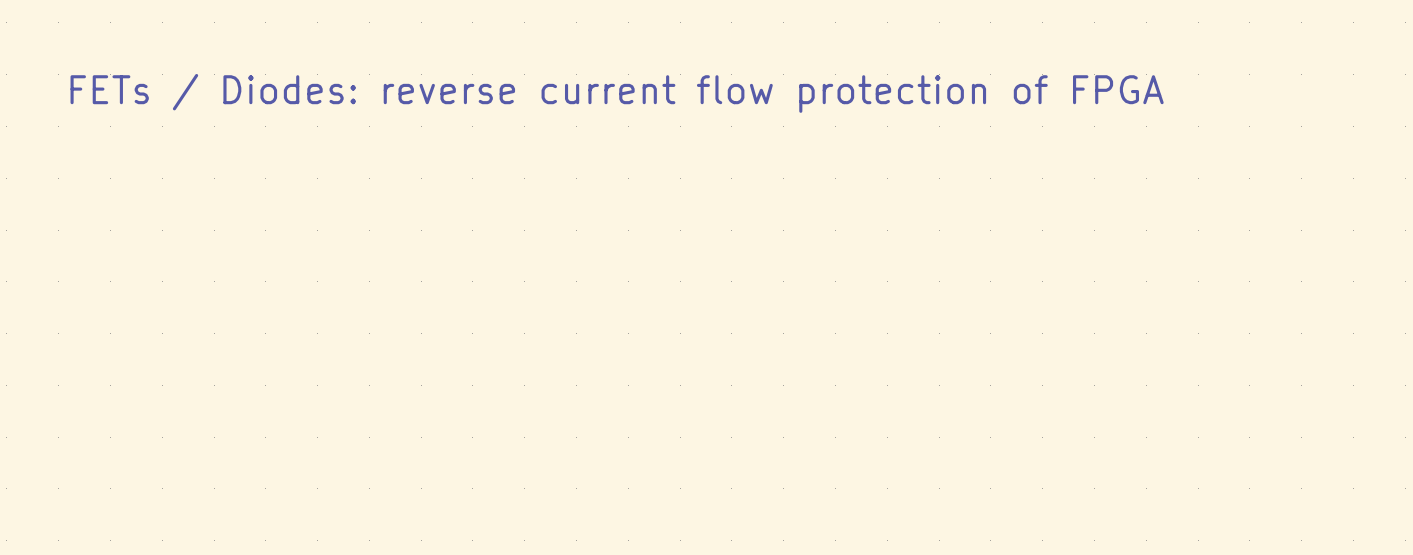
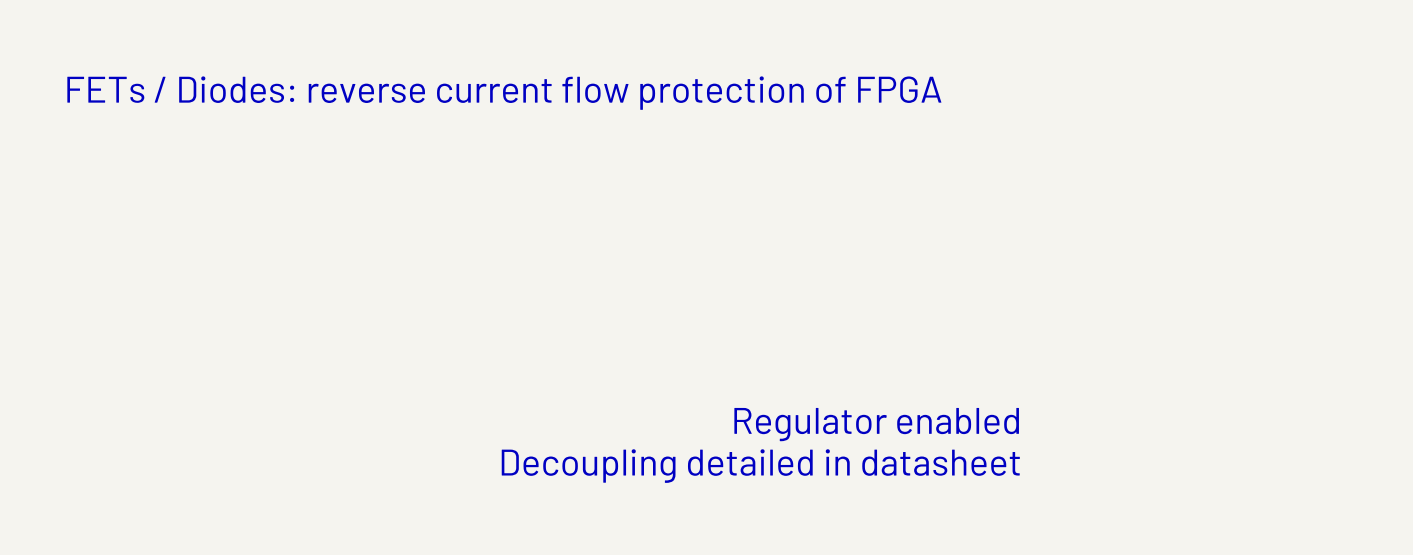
text: none -> Regulator enabled (876, 424)
text: none -> Decoupling detailed in datasheet (760, 466)

